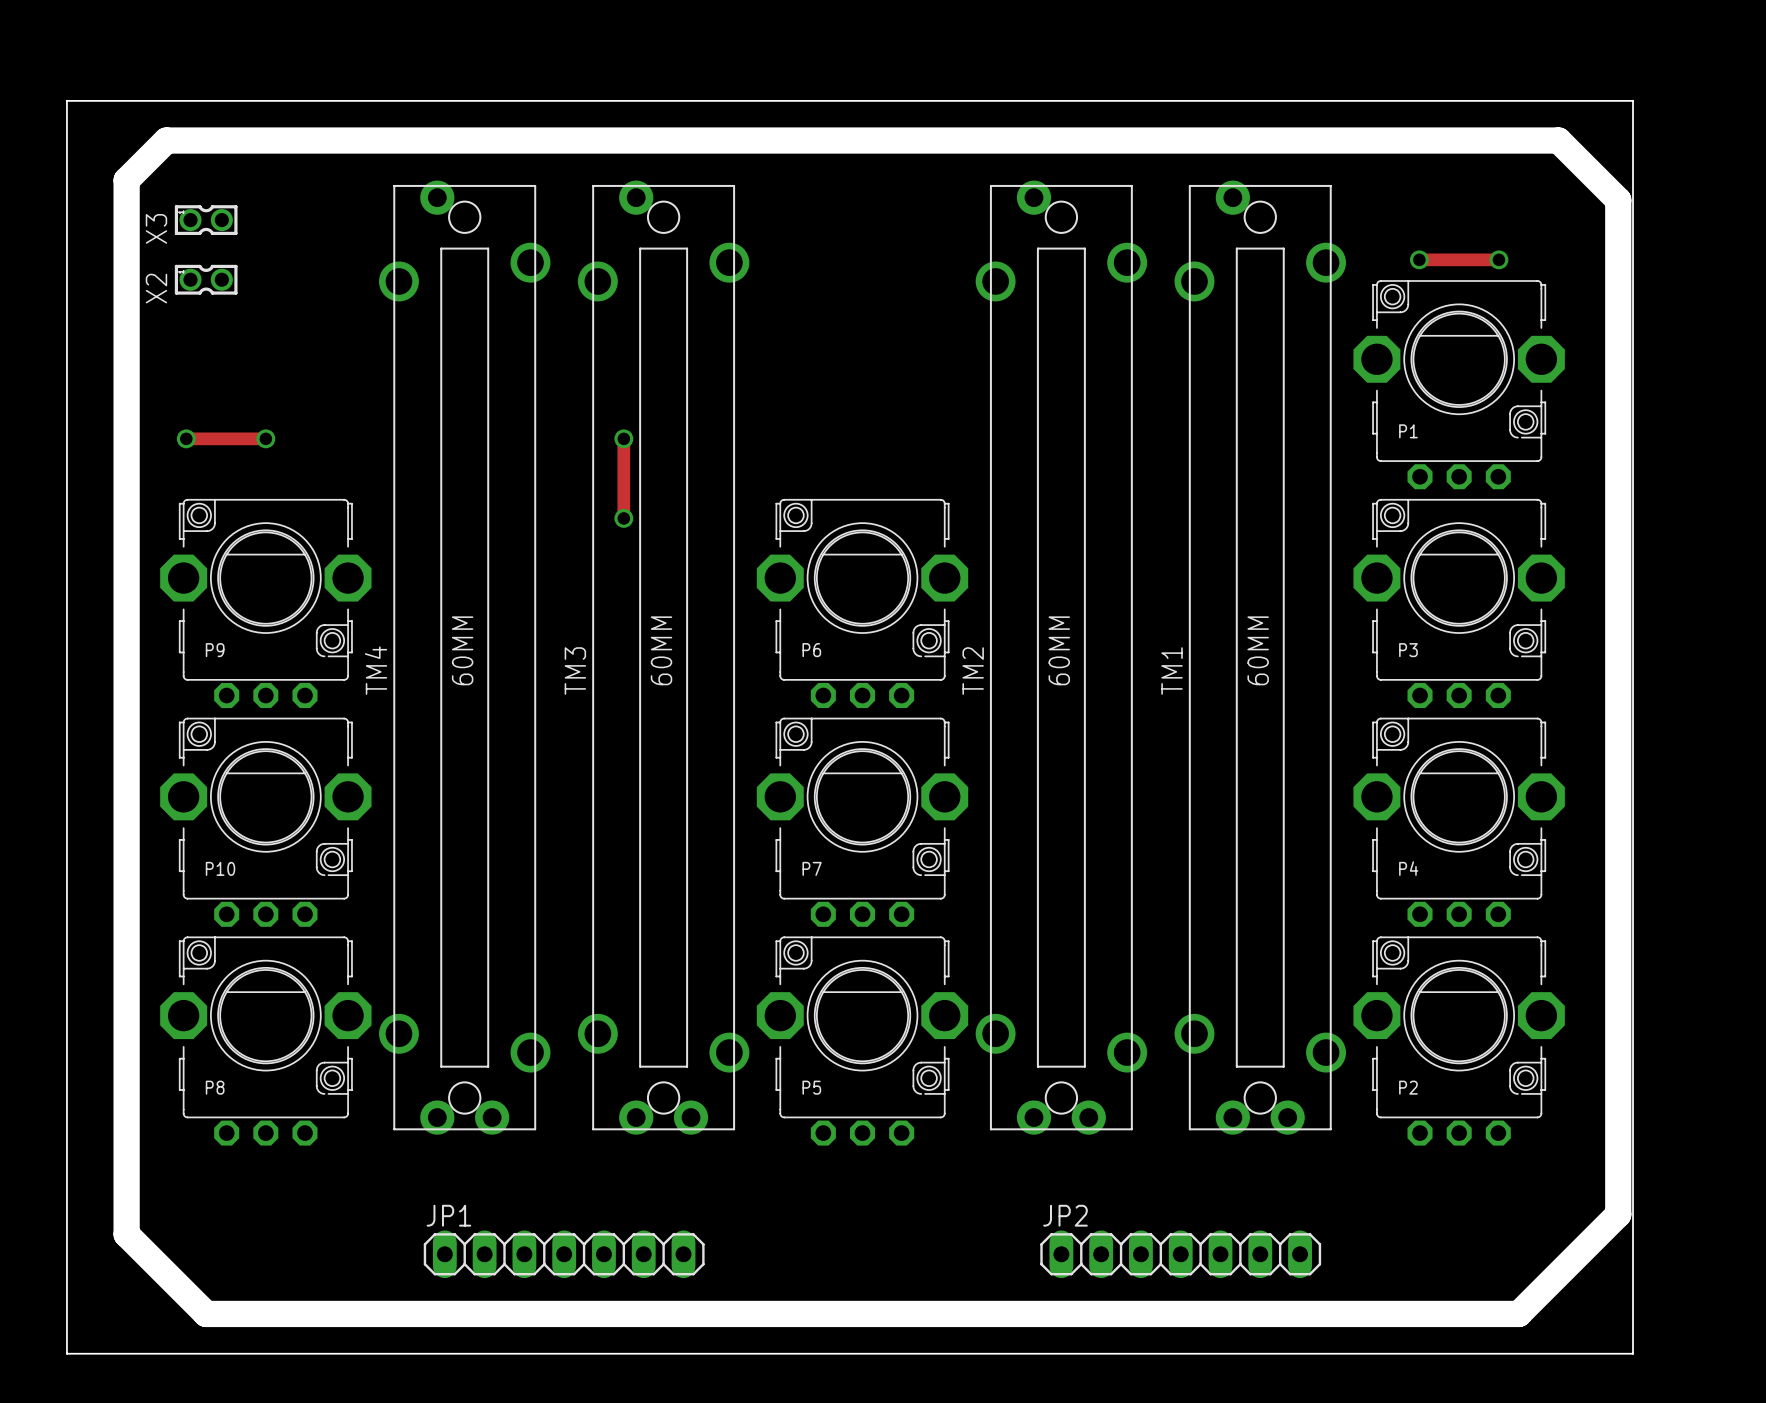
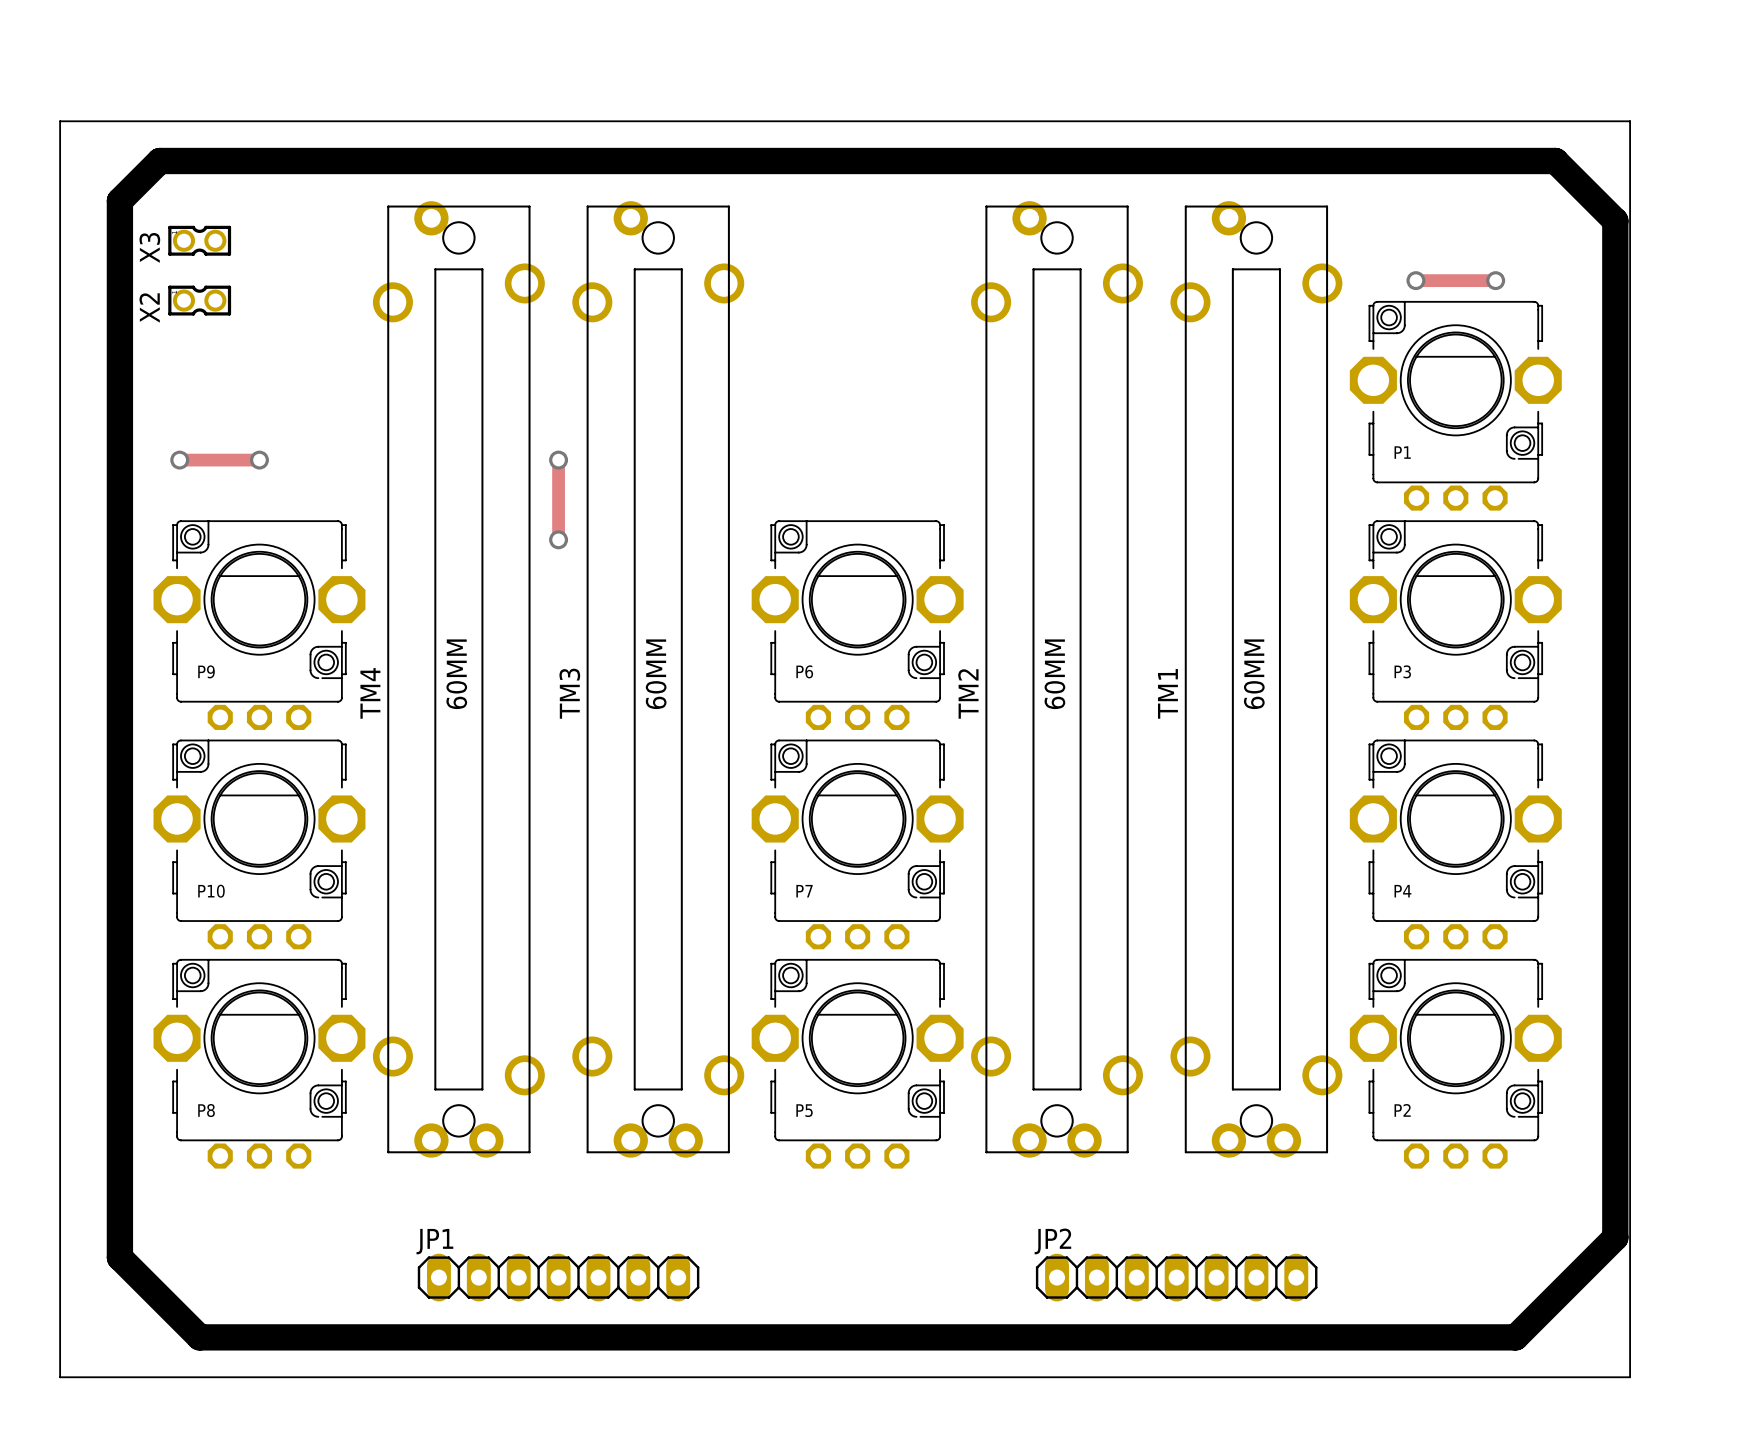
via: none -> (558, 460)
track: (623, 438) (623, 518) -> (558, 460) (558, 539)
via: (623, 438) -> none
via: none -> (558, 539)
via: (623, 518) -> none

